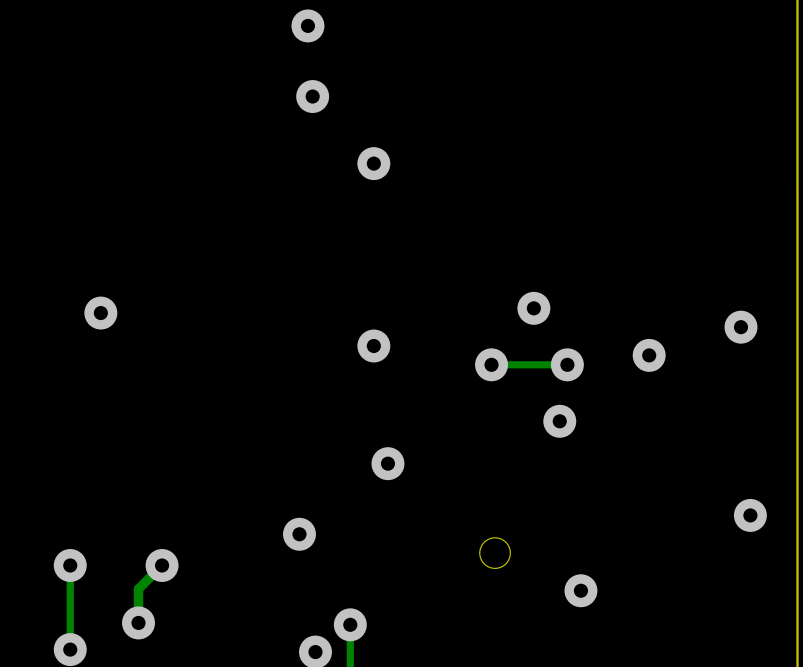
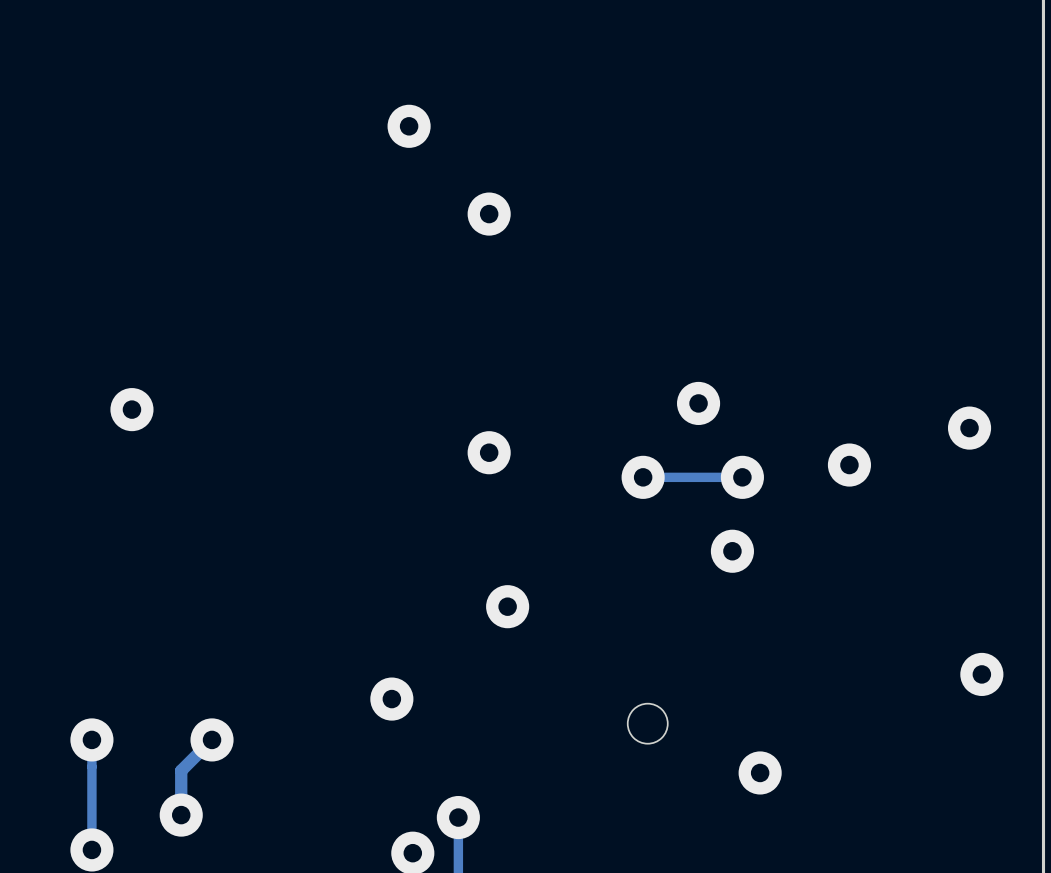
via: (307, 25) -> none

